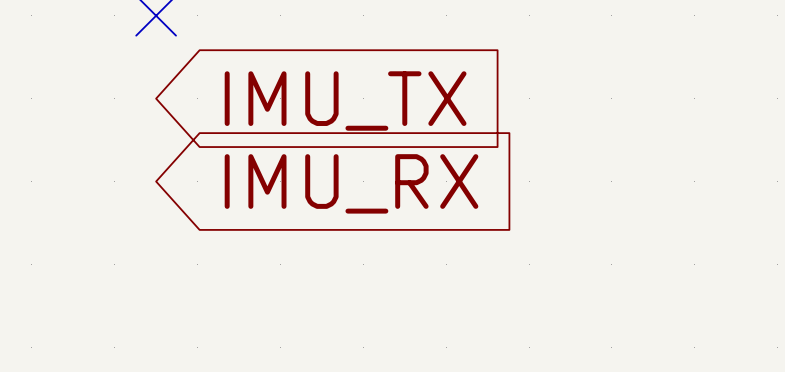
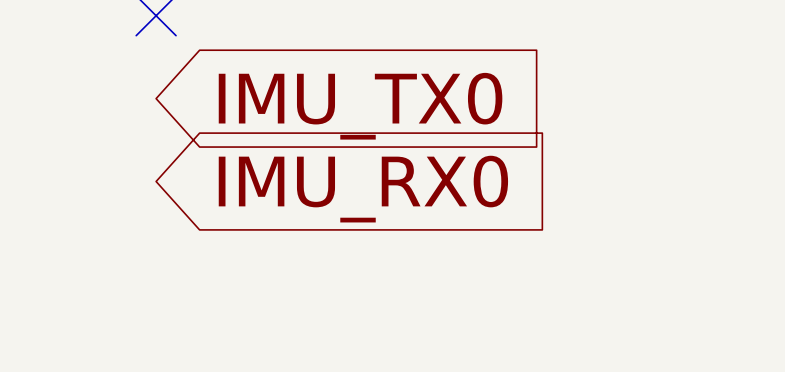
global label: IMU_TX (345, 100) -> IMU_TX0 (360, 106)
global label: IMU_RX (351, 183) -> IMU_RX0 (363, 189)

